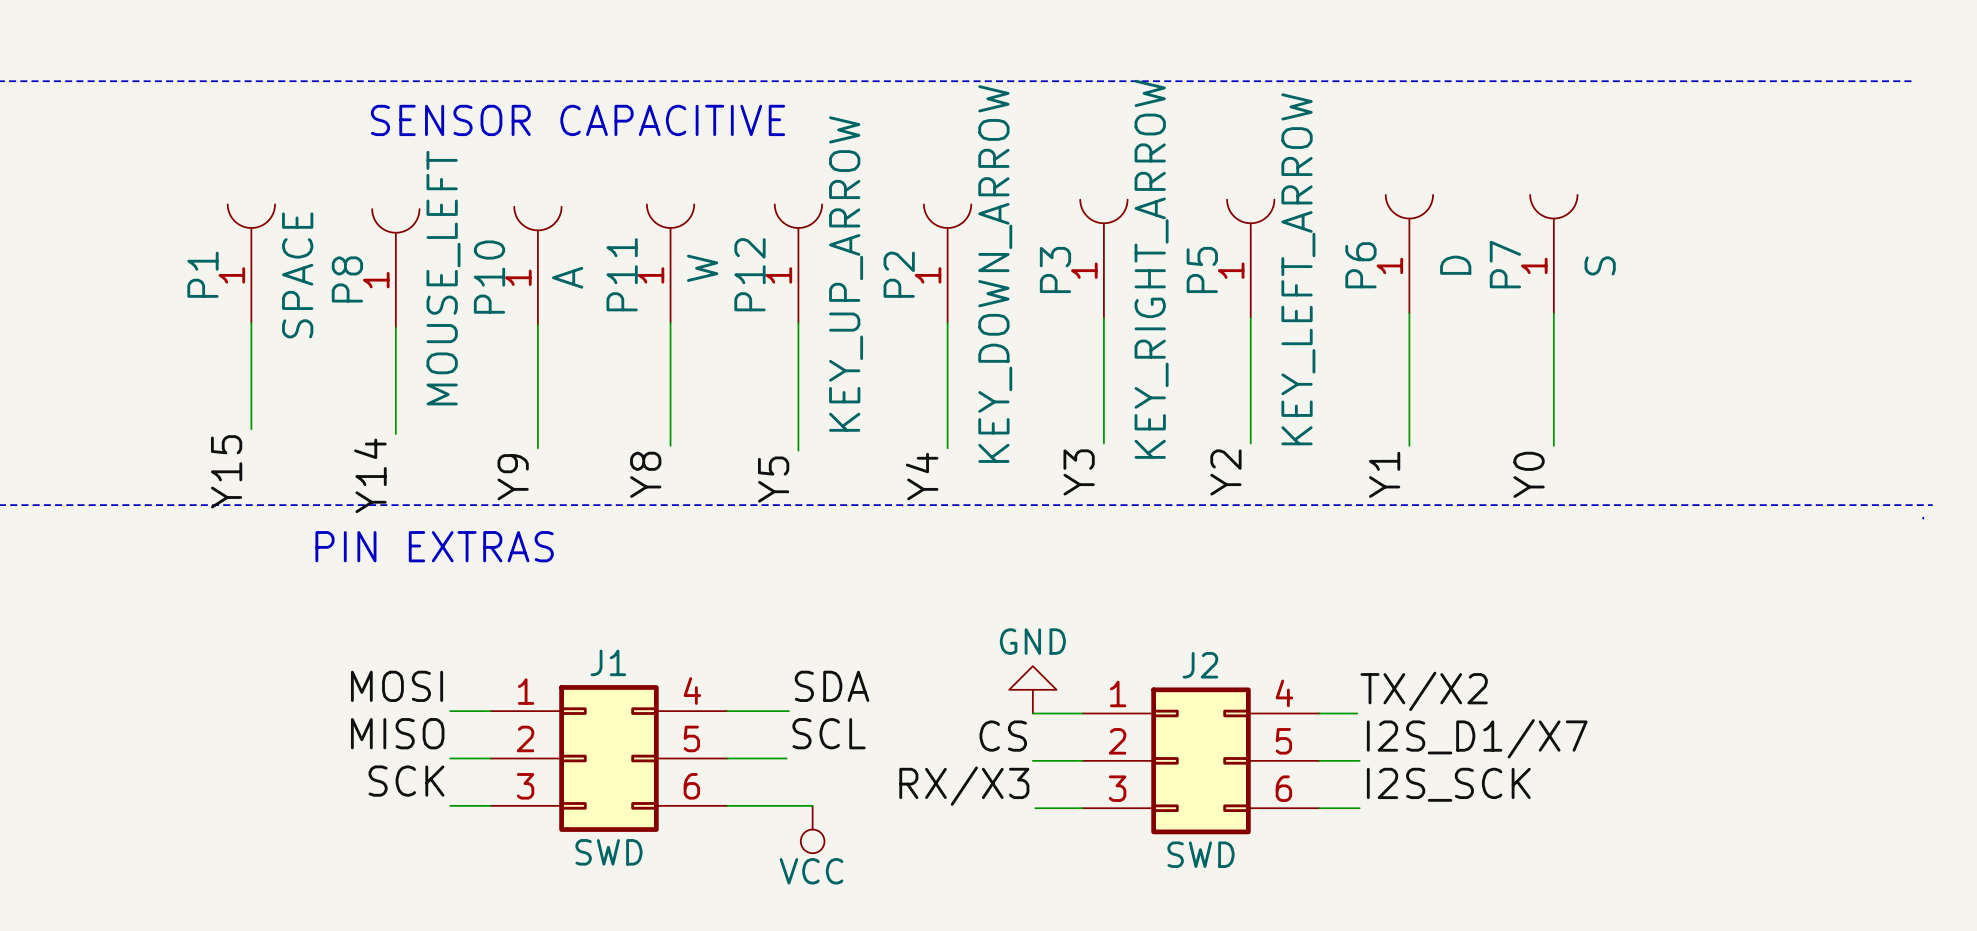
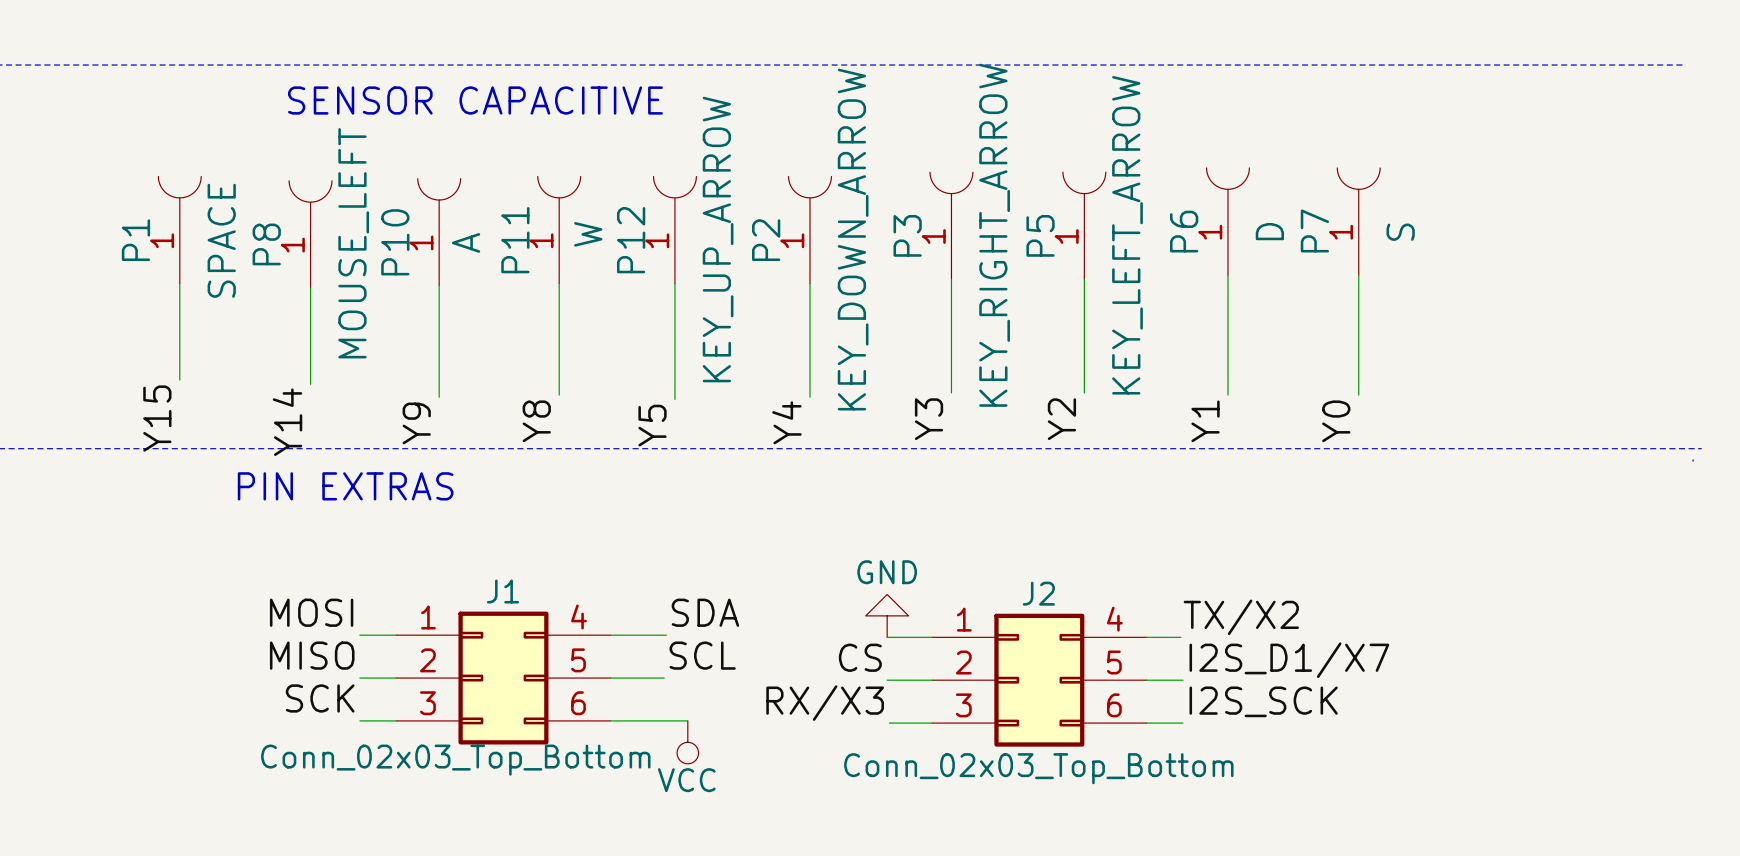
J1 value: SWD (608, 852) -> Conn_02x03_Top_Bottom (455, 760)
J2 value: SWD (1201, 854) -> Conn_02x03_Top_Bottom (1038, 768)

